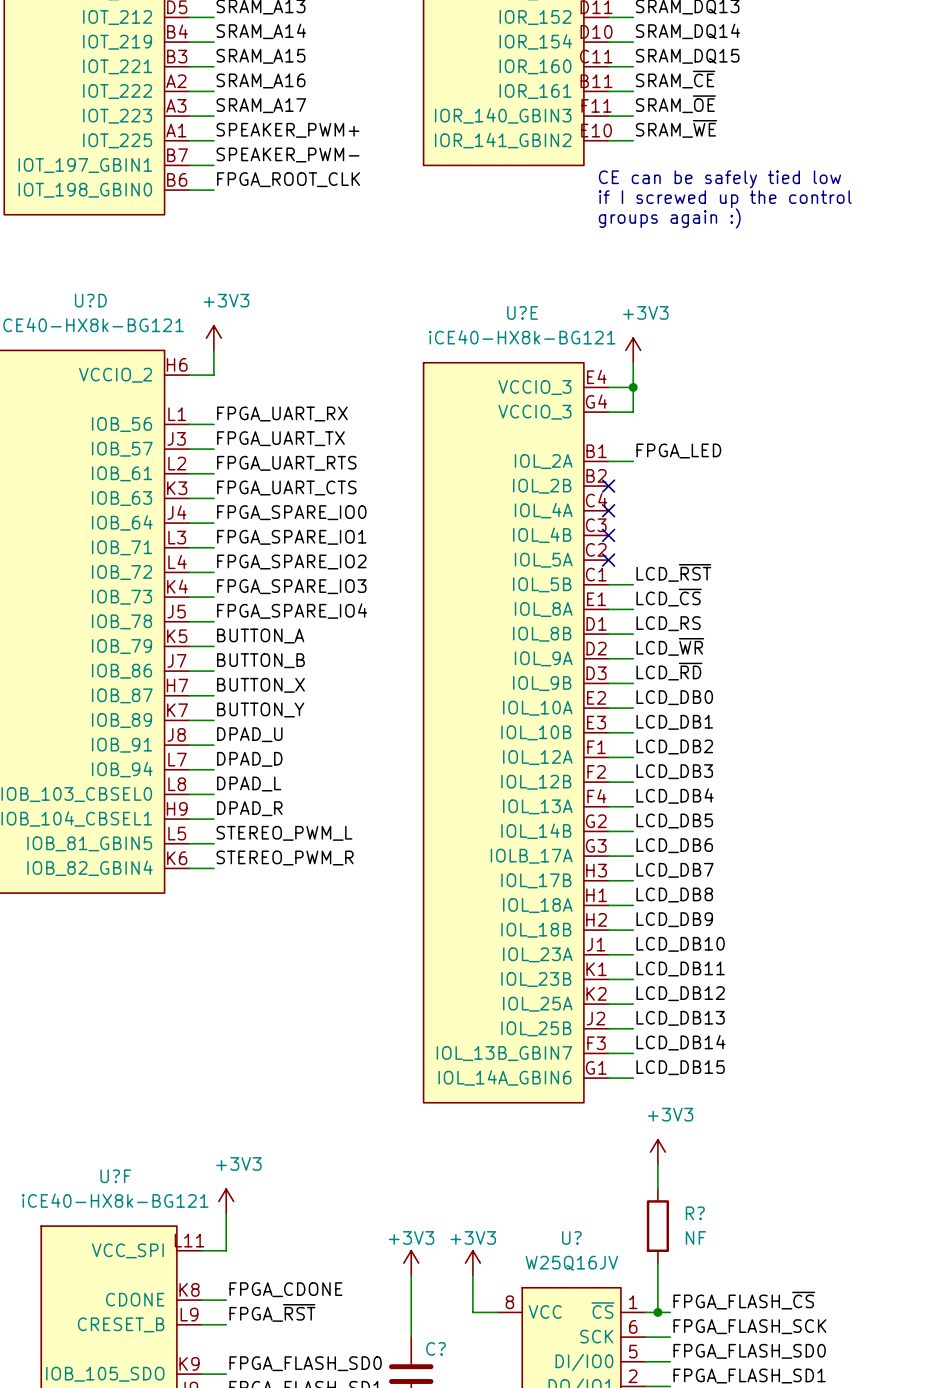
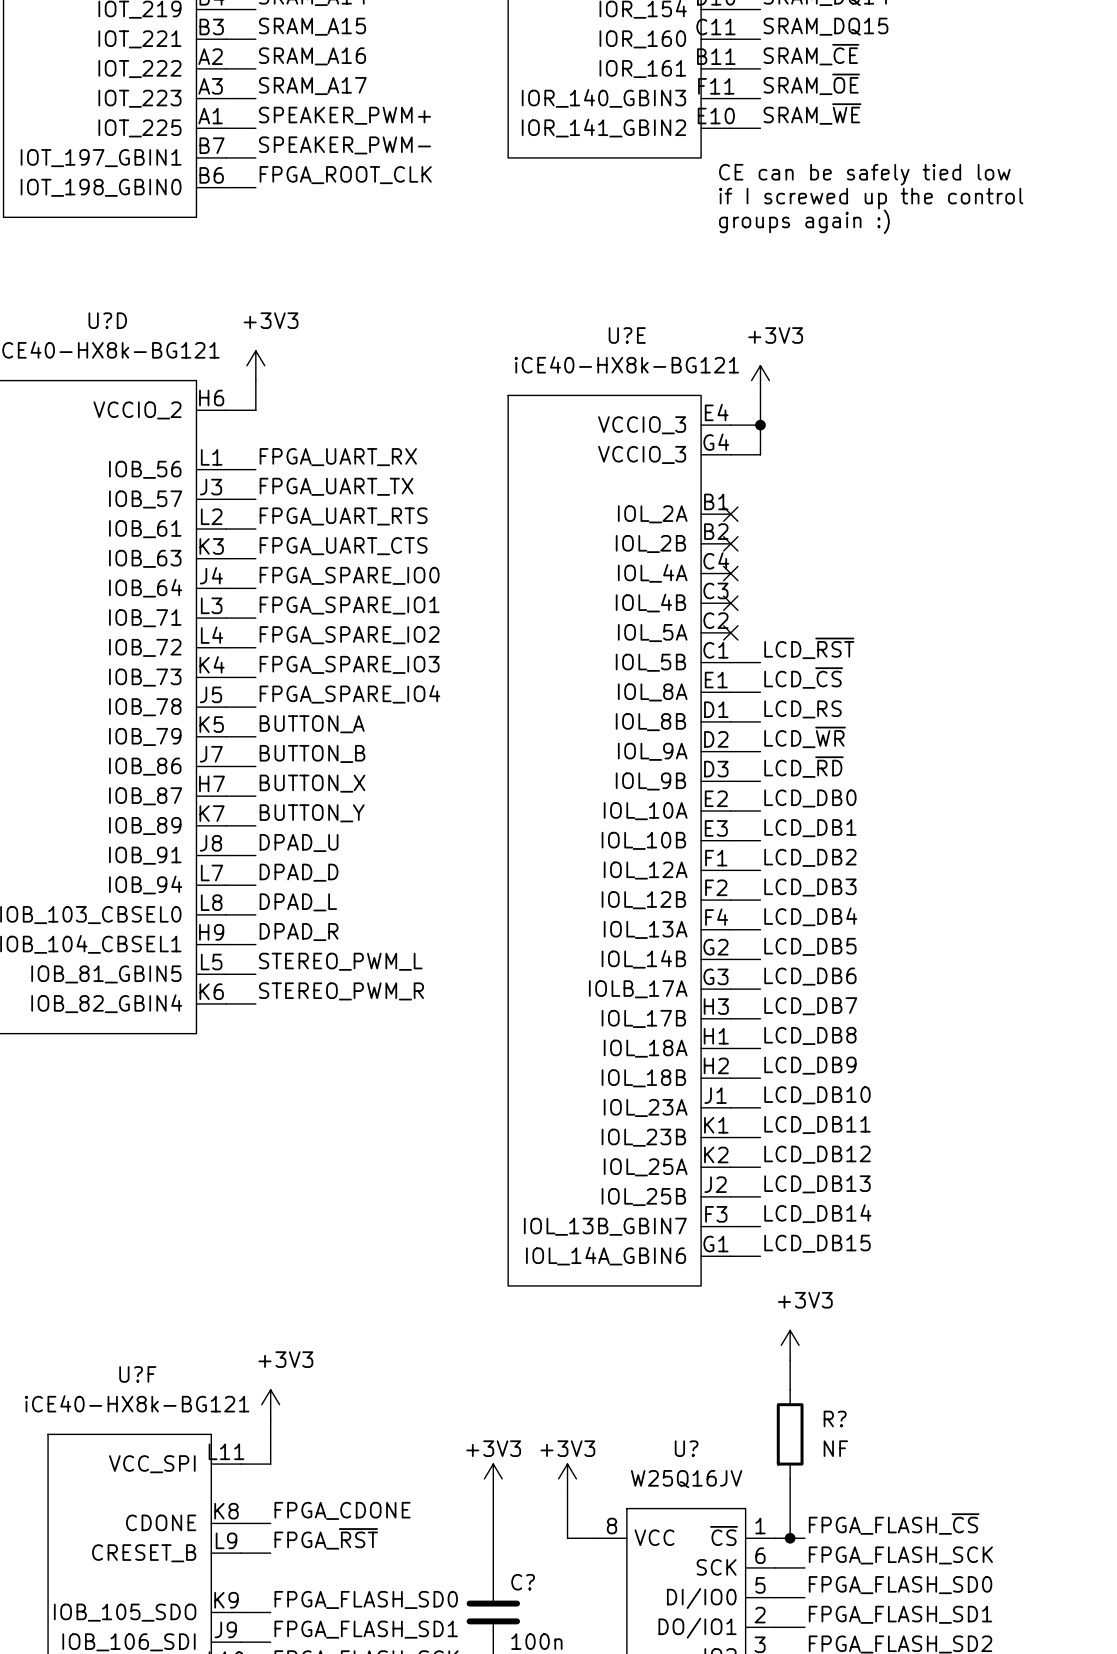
label: FPGA_LED (678, 451) -> none
wire: (608, 461) (633, 461) -> none
no-connect mark: none -> (730, 514)

